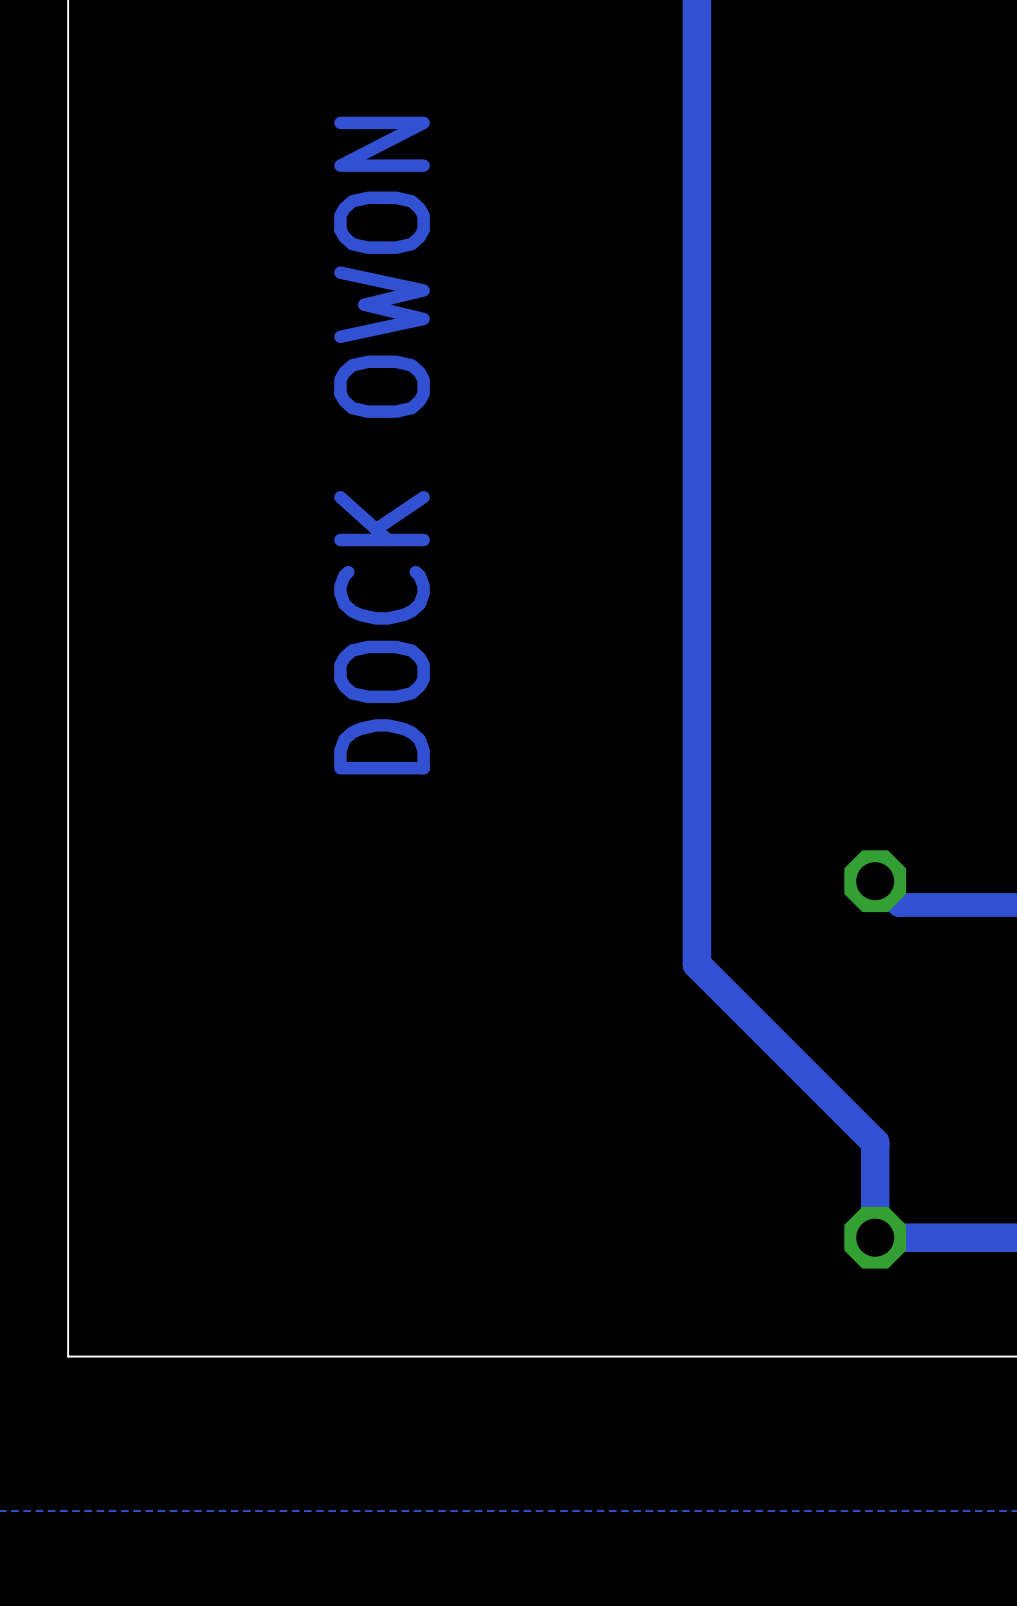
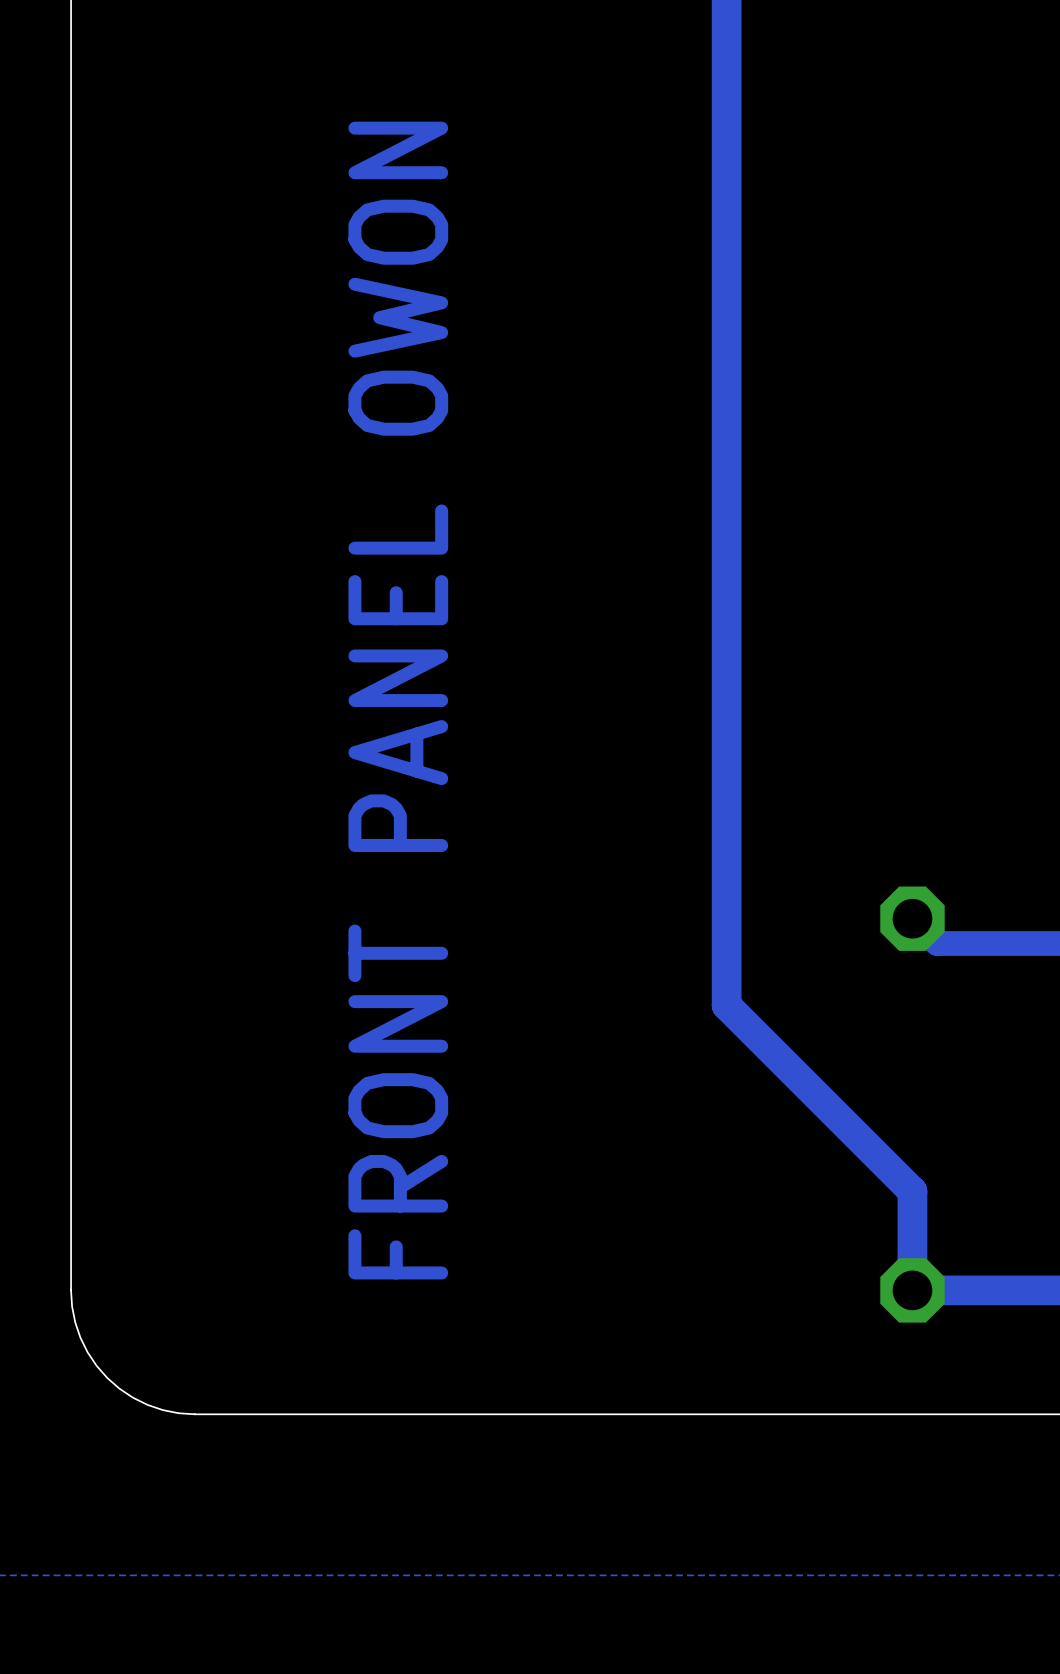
text: DOCK OWON (382, 445) -> FRONT PANEL OWON (398, 700)
board edge: (68, 1237) (68, 1356) (186, 1356) -> (71, 1290) (75, 1322) (80, 1337) (96, 1365) (107, 1378) (119, 1388) (147, 1404) (162, 1410) (194, 1414)

